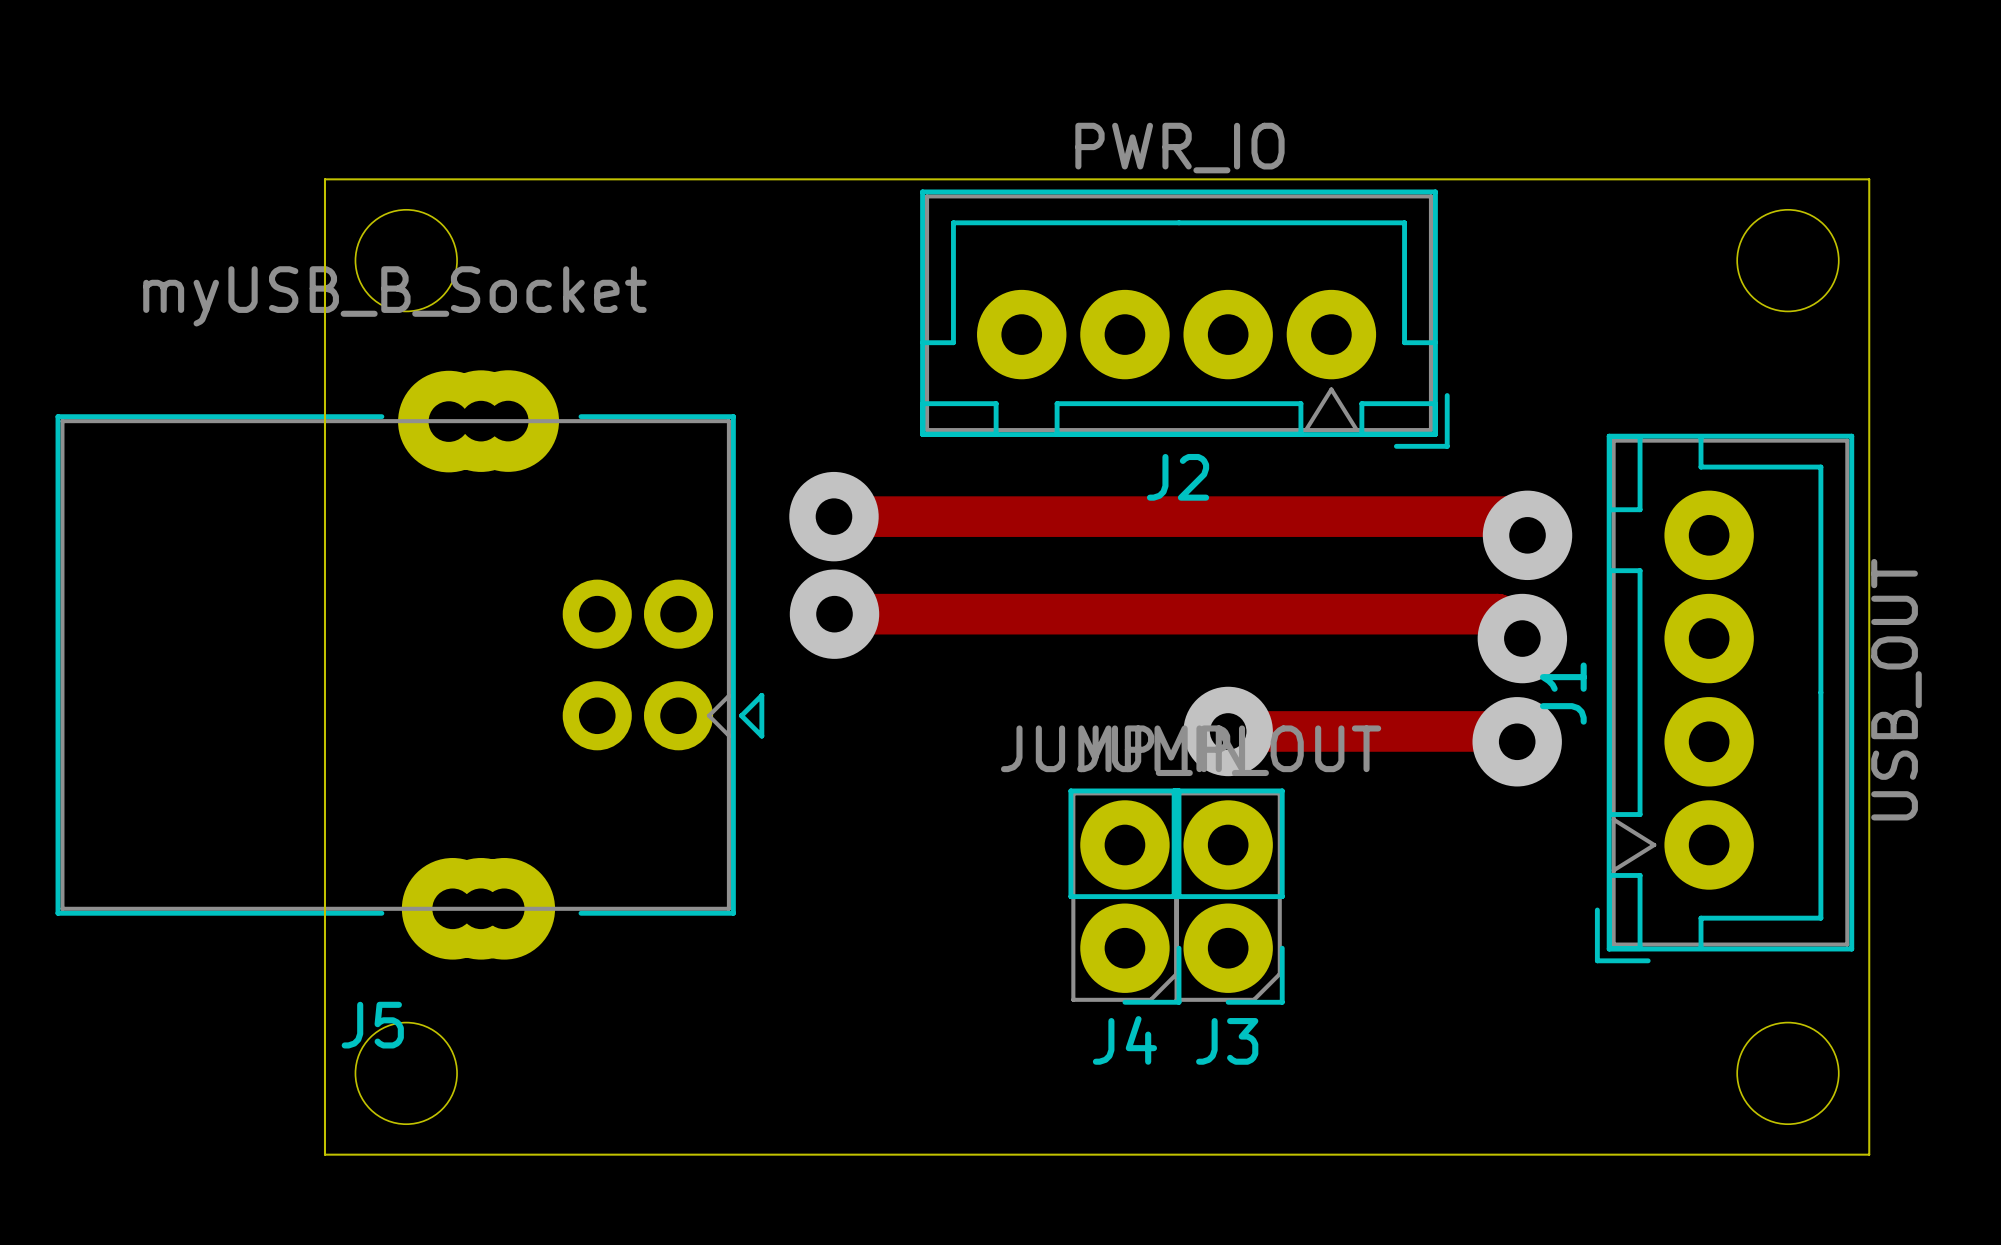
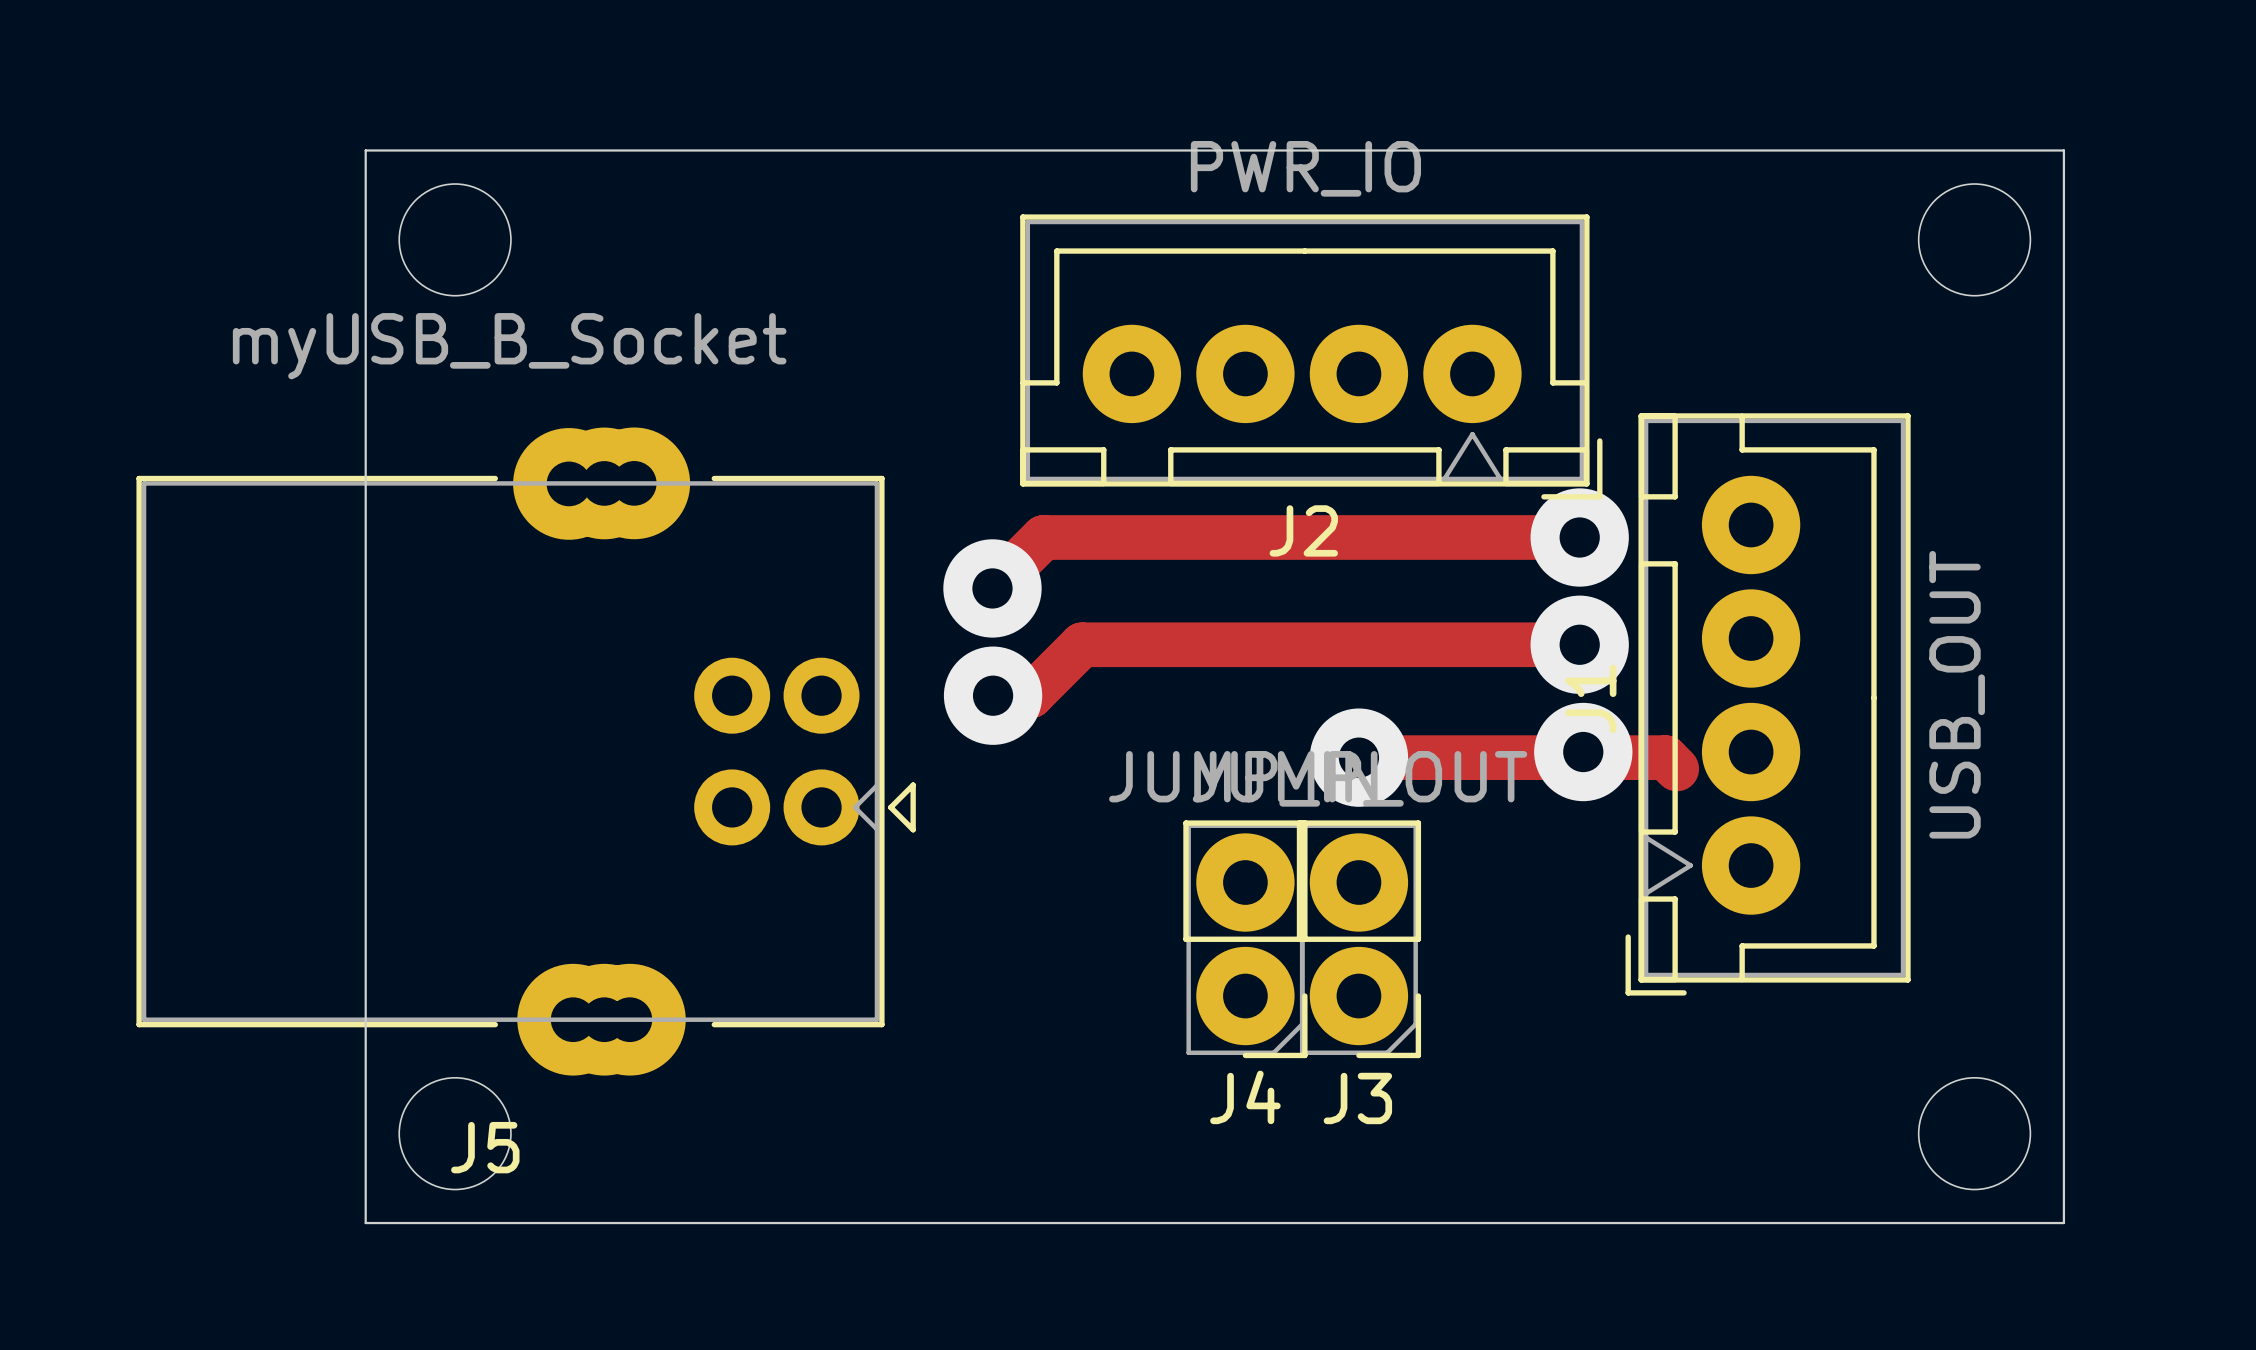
J2 position: (1184, 319) -> (1311, 356)
track: (833, 516) (1508, 516) (1527, 535) -> none
via: (833, 516) -> none
track: none -> (1579, 537) (1043, 537) (992, 588)
via: none -> (1579, 537)
via: (1527, 535) -> none
via: none -> (992, 588)
track: (834, 614) (1497, 614) (1522, 638) -> none
via: (834, 614) -> none
track: none -> (1579, 644) (1082, 644) (1031, 695) (993, 695)
via: none -> (1579, 644)
via: (1522, 638) -> none
J5 position: (409, 664) -> (526, 751)
via: none -> (993, 695)
J1 position: (1724, 698) -> (1768, 704)
via: none -> (1583, 752)
via: (1517, 741) -> none

